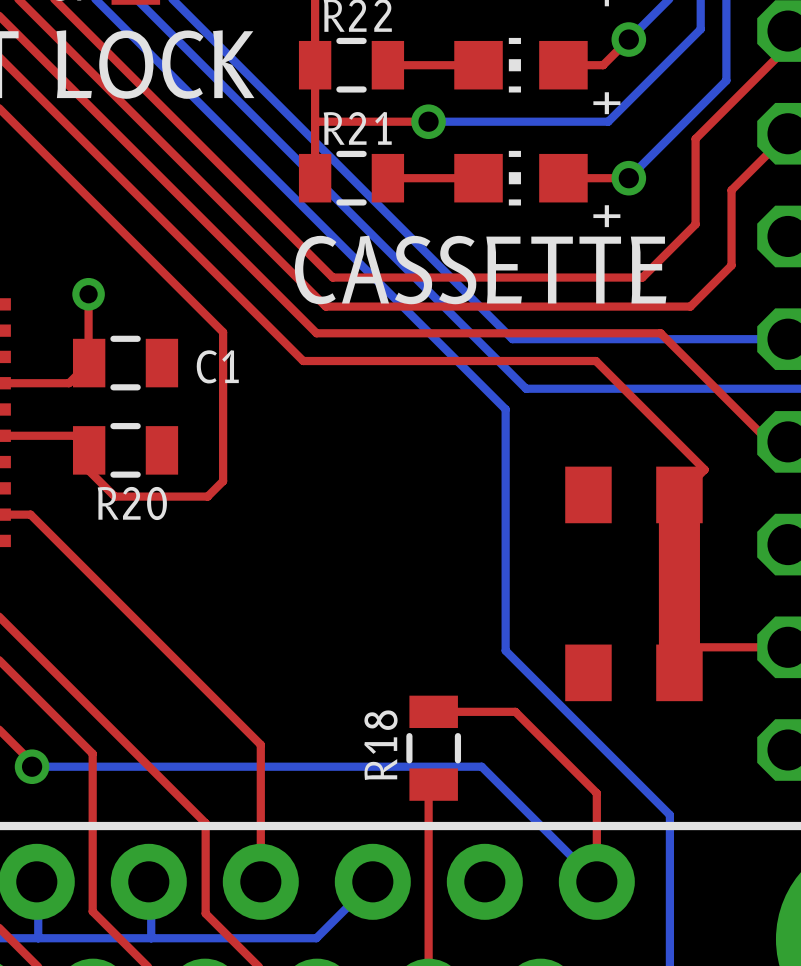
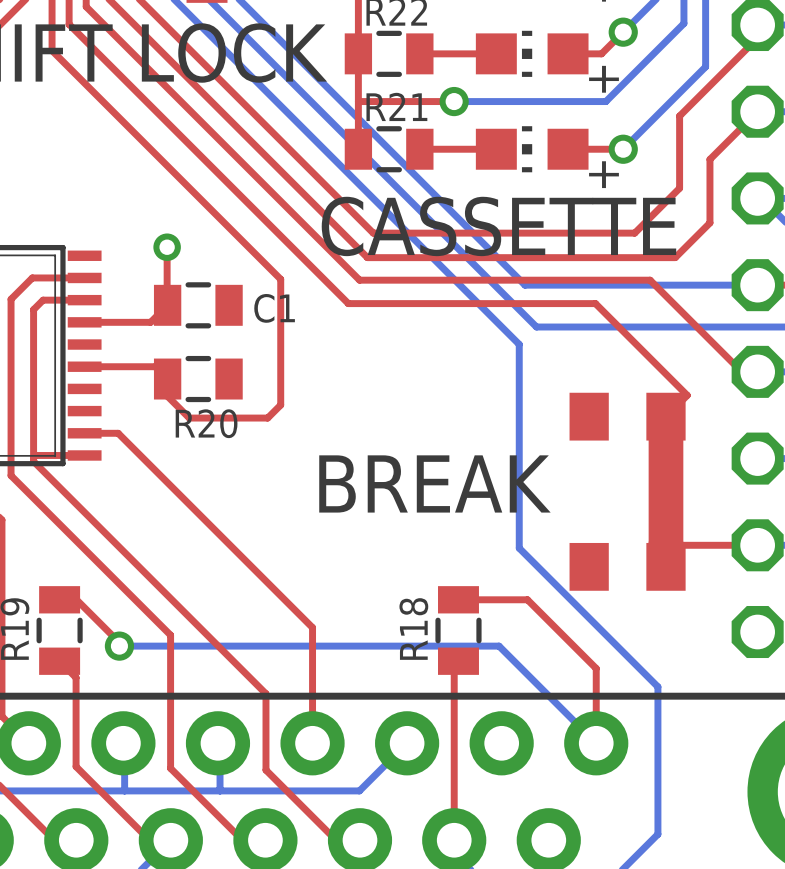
text: none -> BREAK (434, 483)

